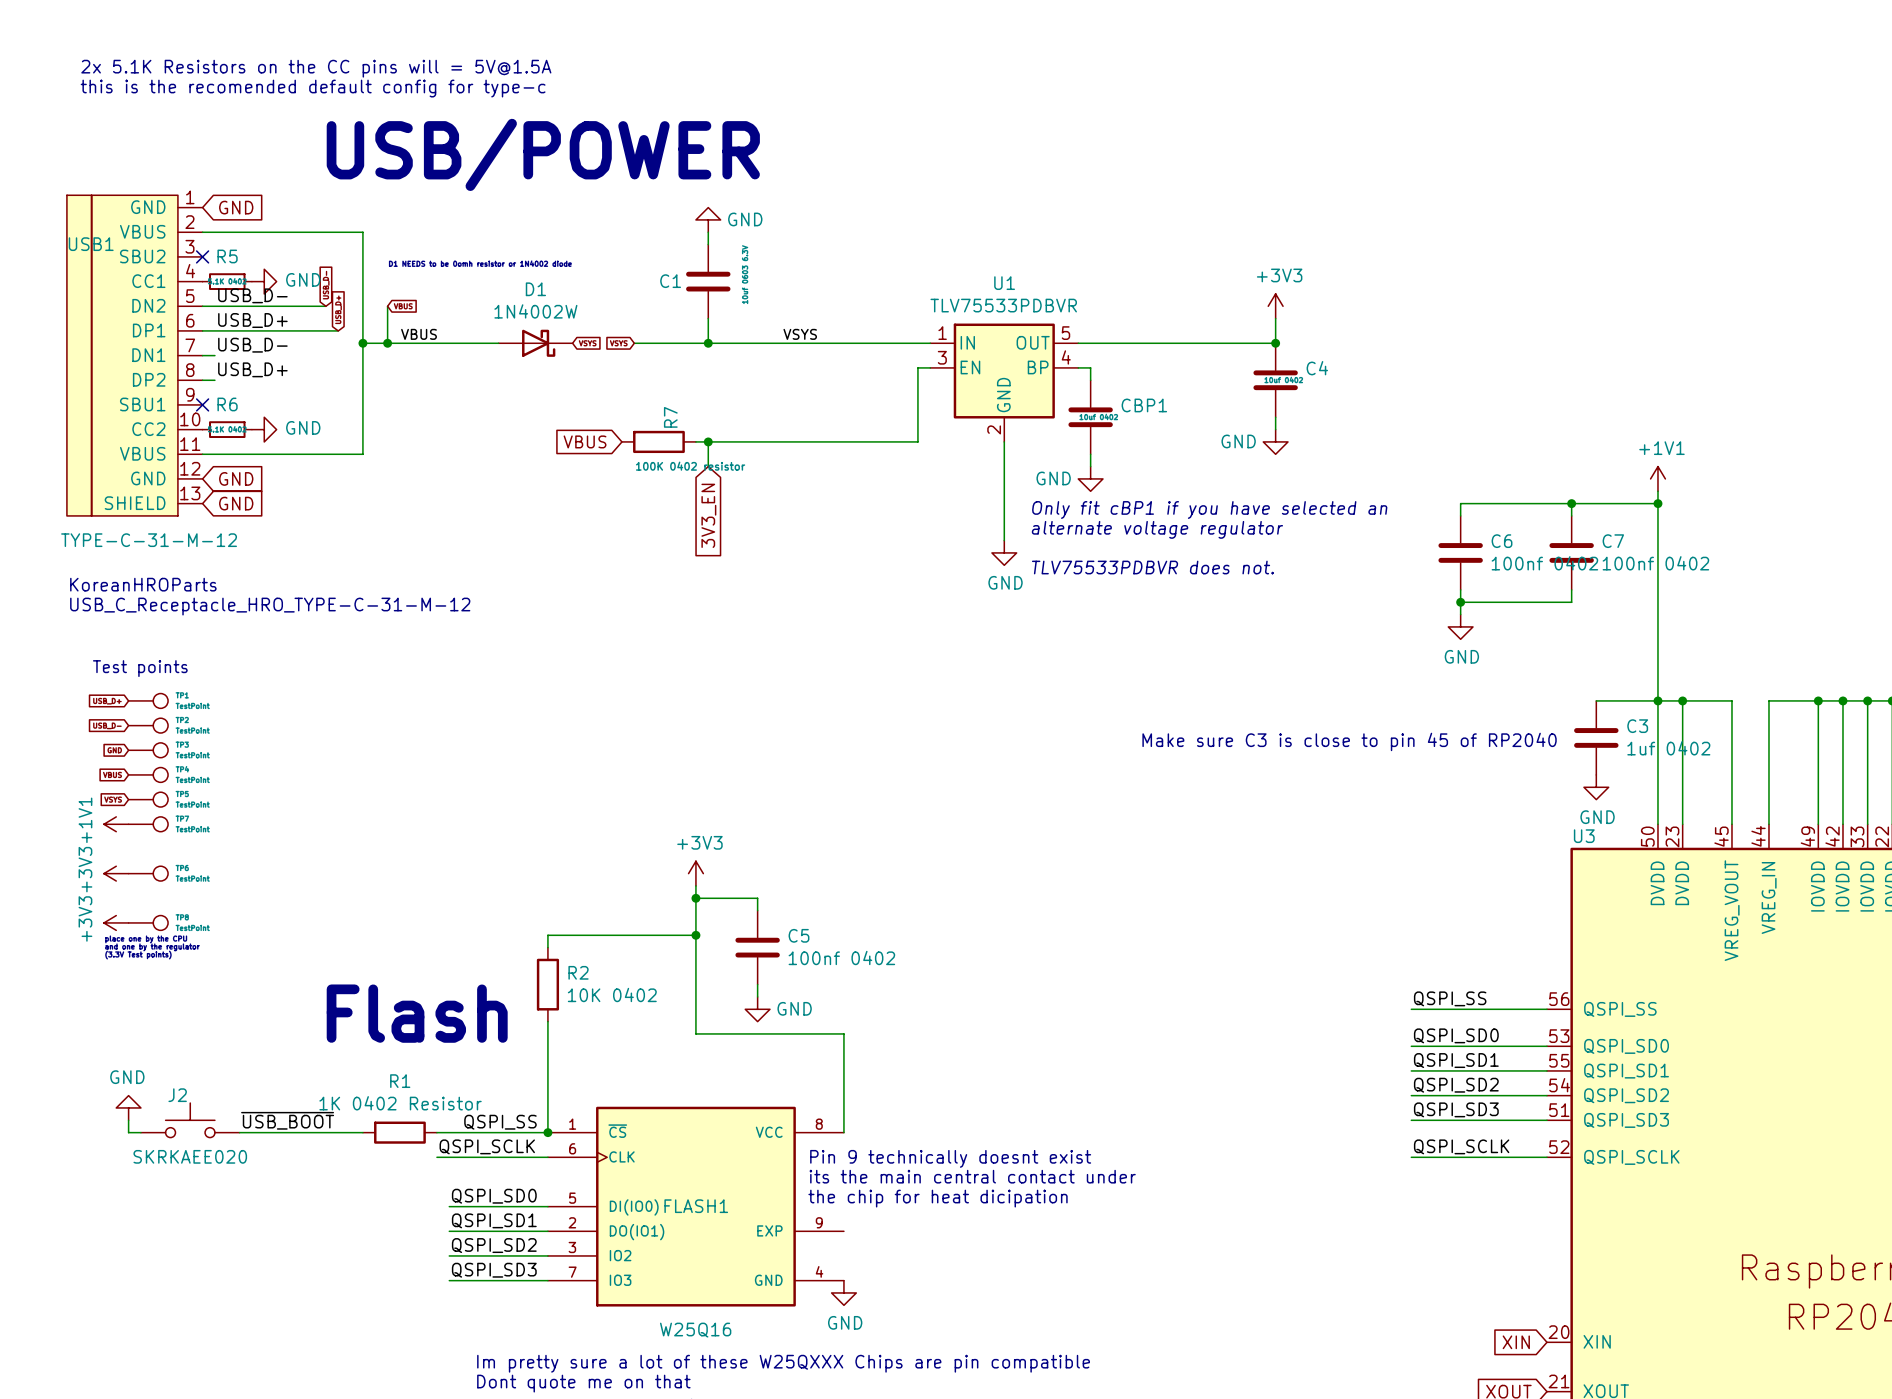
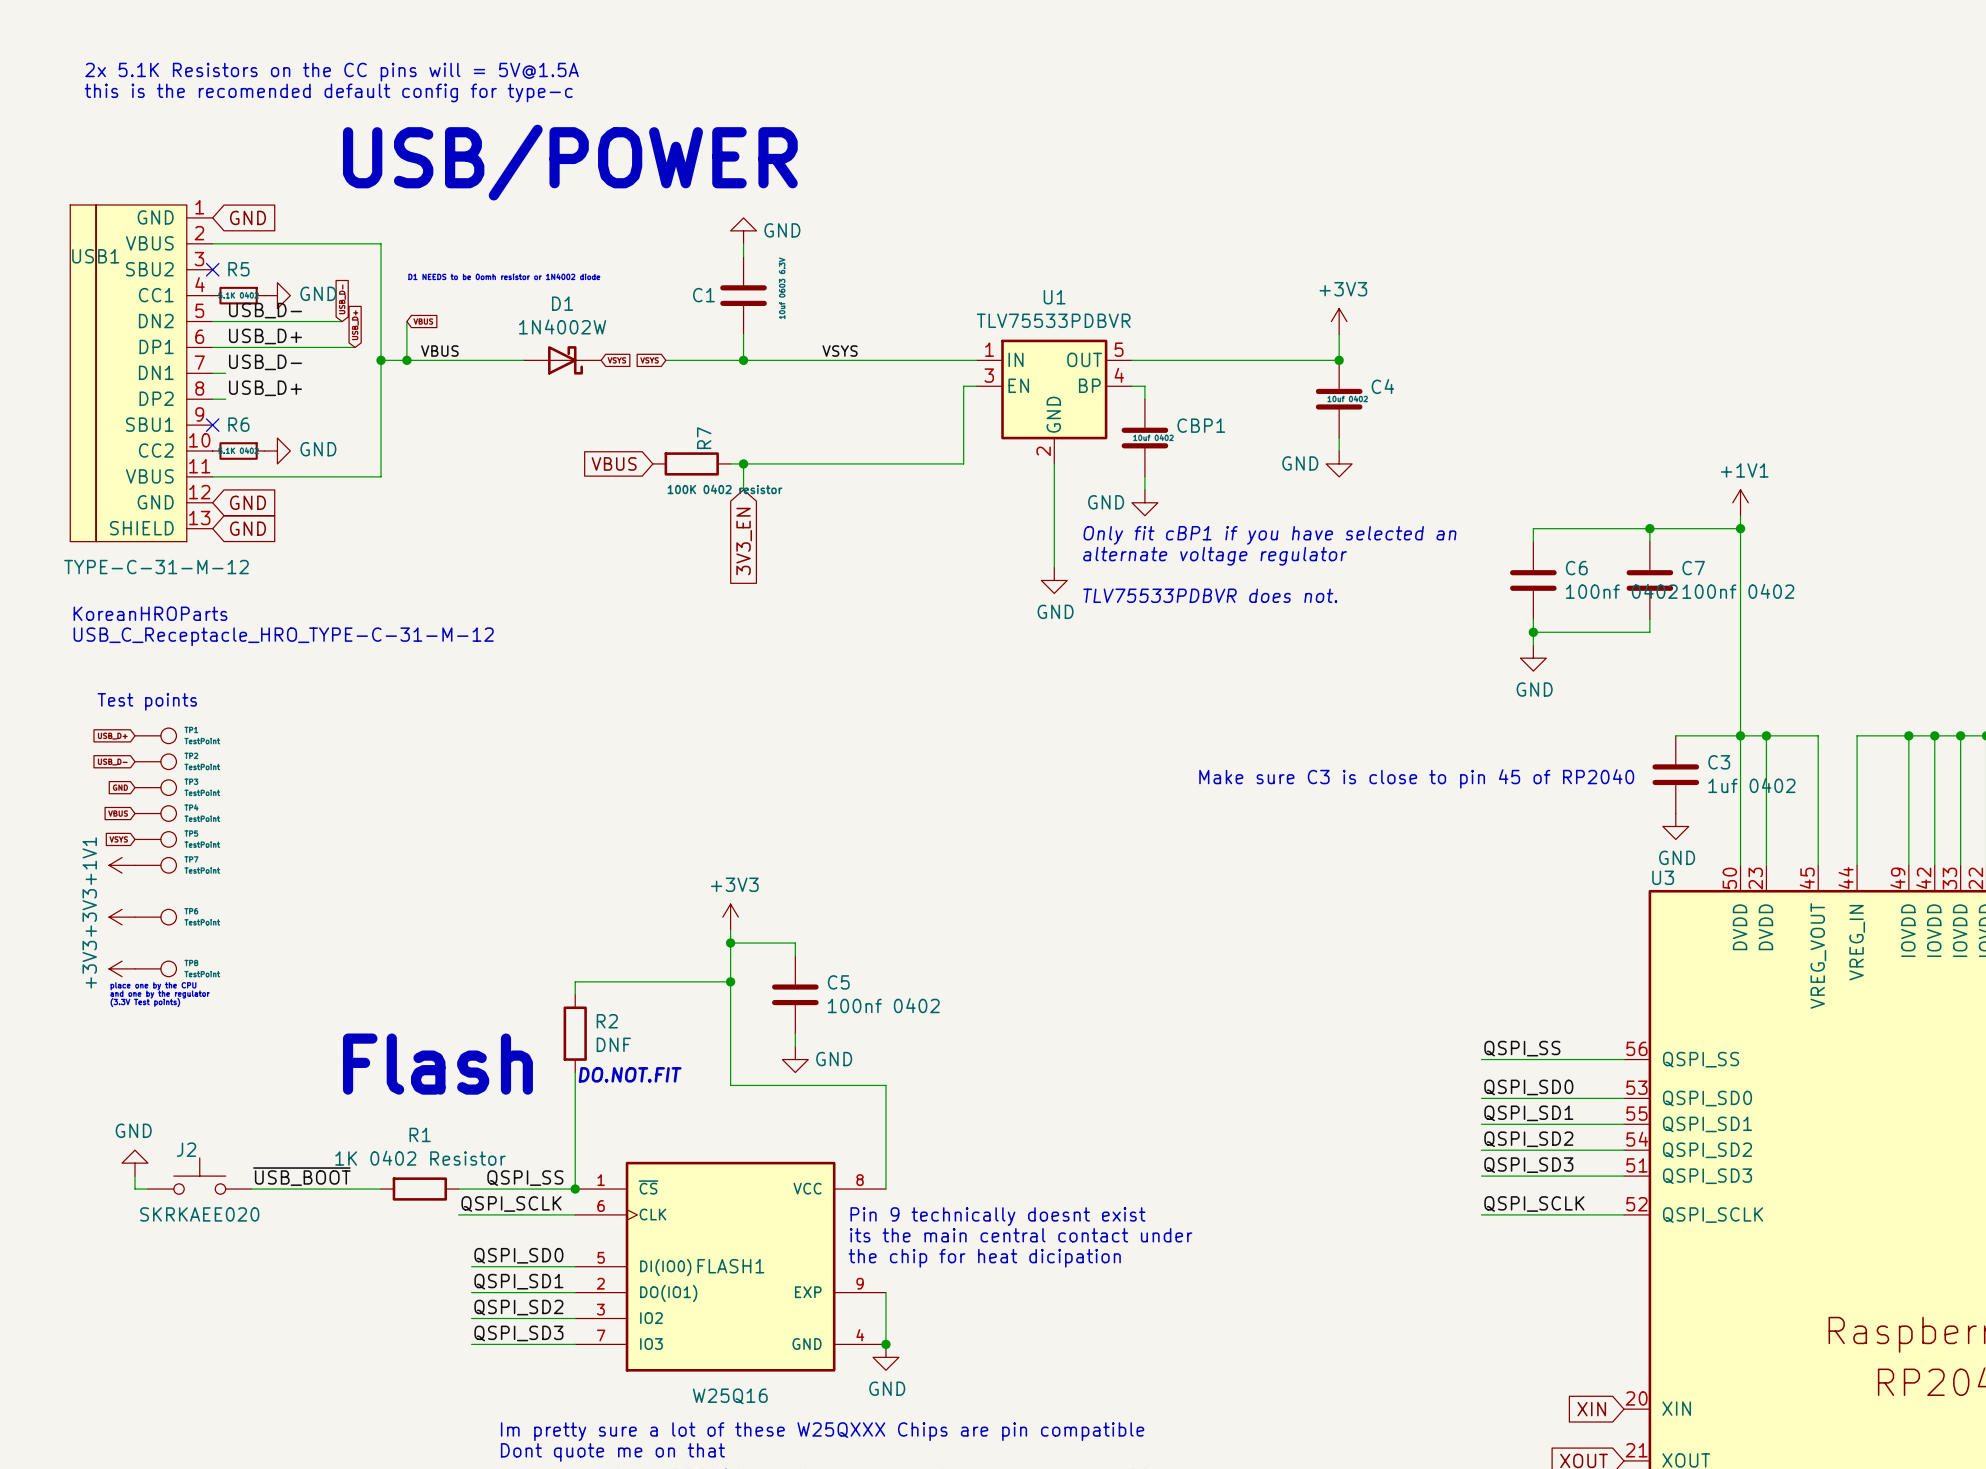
R2 value: 10K 0402 (612, 994) -> DNF (613, 1044)
text: none -> DO.NOT.FIT (630, 1074)
wire: none -> (885, 1292) (885, 1344)
junction: none -> (885, 1344)

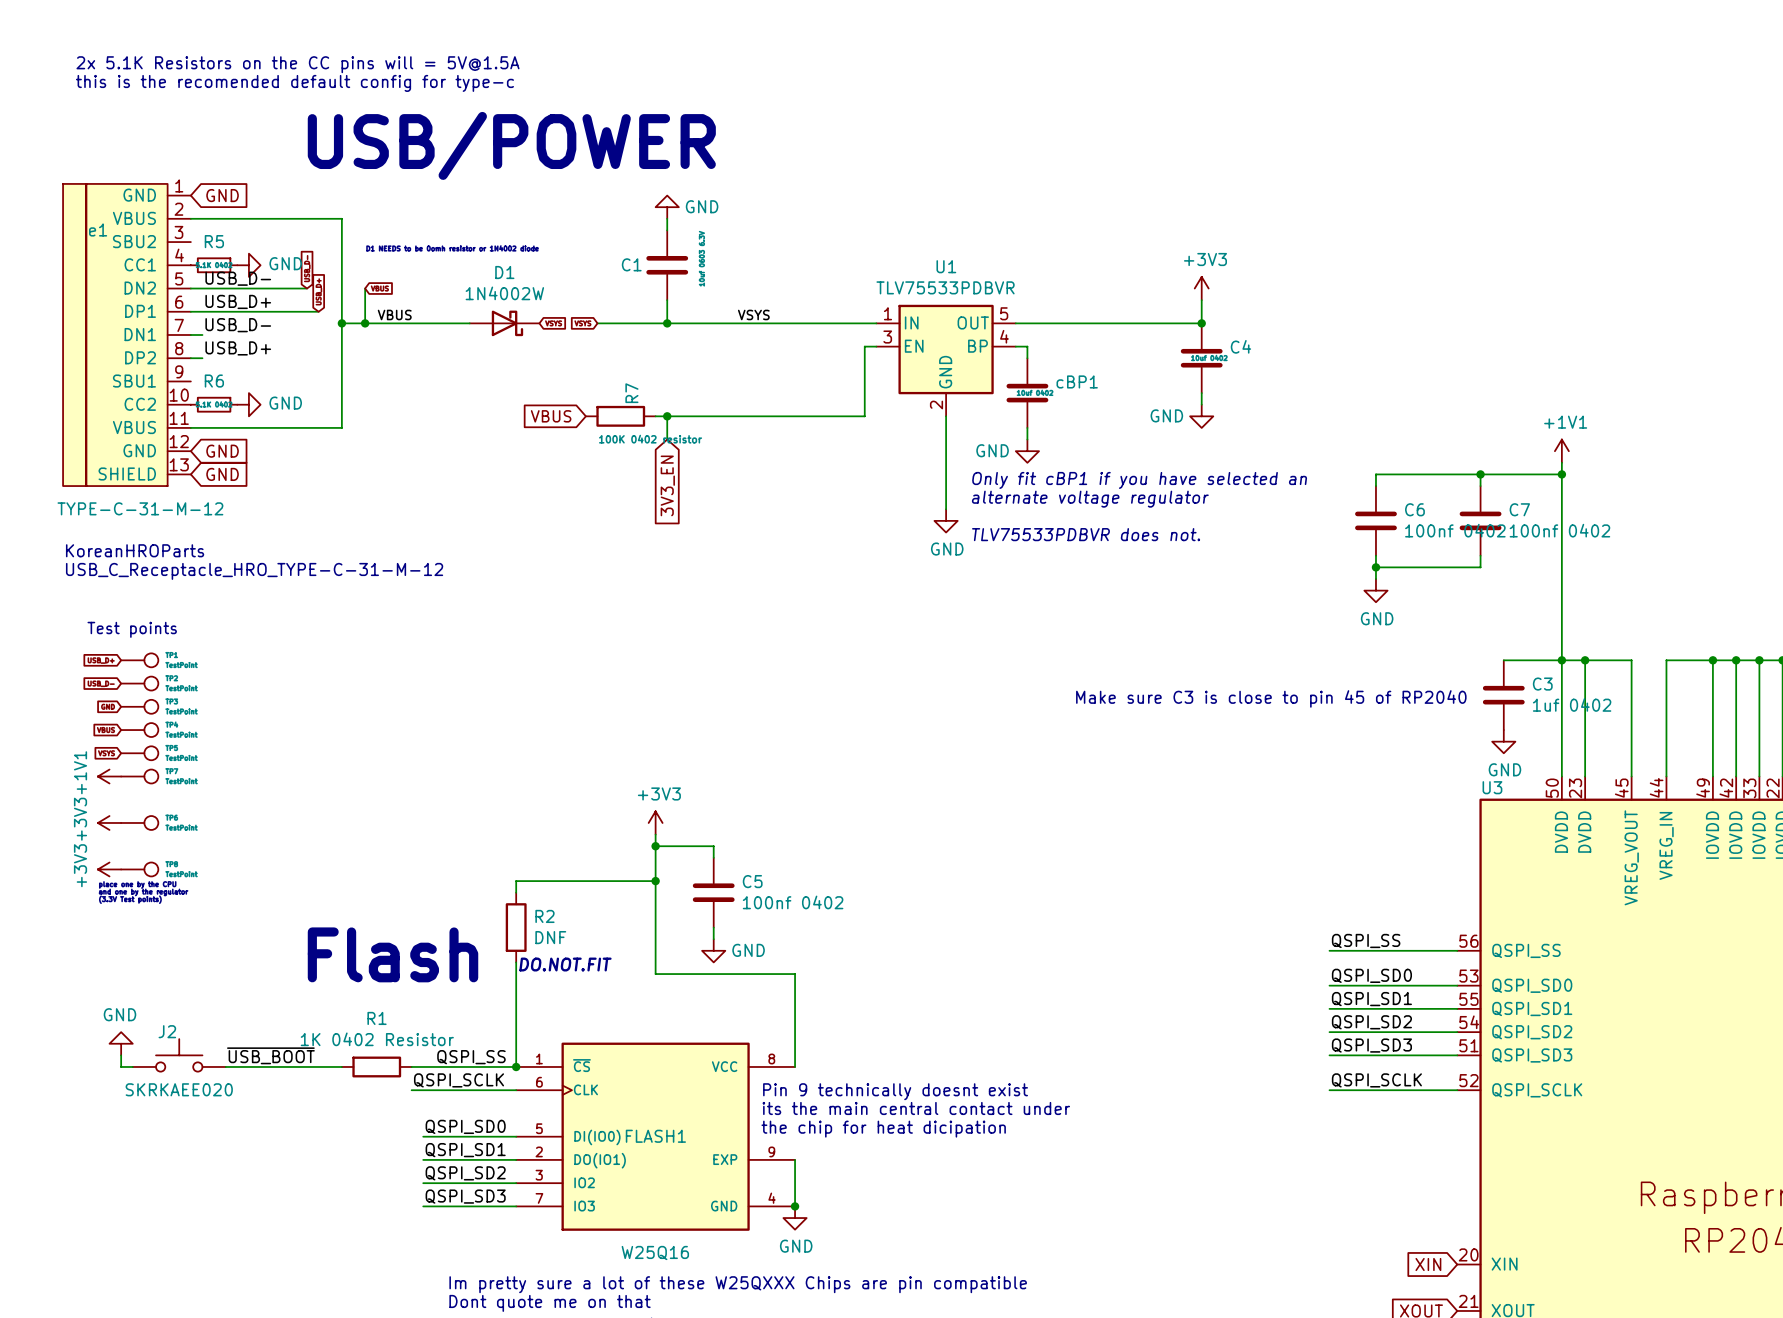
USB1 name: USB1 (95, 256) -> e1 (98, 229)
no-connect mark: (212, 269) -> none
no-connect mark: (212, 425) -> none
CBP1 name: CBP1 (1201, 425) -> cBP1 (1077, 381)

